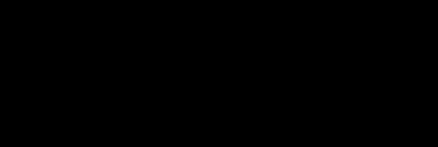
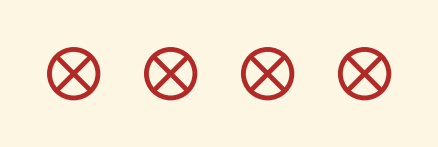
part: none -> (73, 73)
part: none -> (170, 73)
part: none -> (267, 73)
part: none -> (364, 73)

